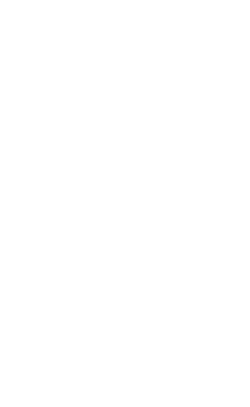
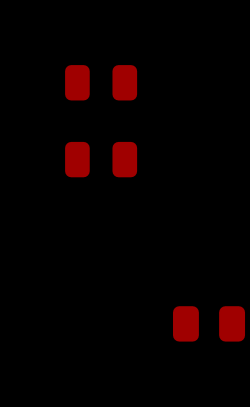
part: none -> (101, 82)
part: none -> (101, 159)
part: none -> (209, 323)

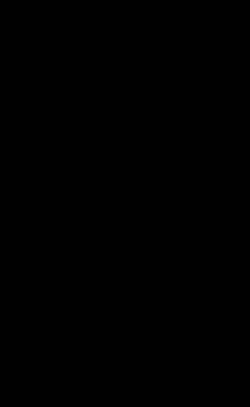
part: (101, 82) -> none
part: (101, 159) -> none
part: (209, 323) -> none

